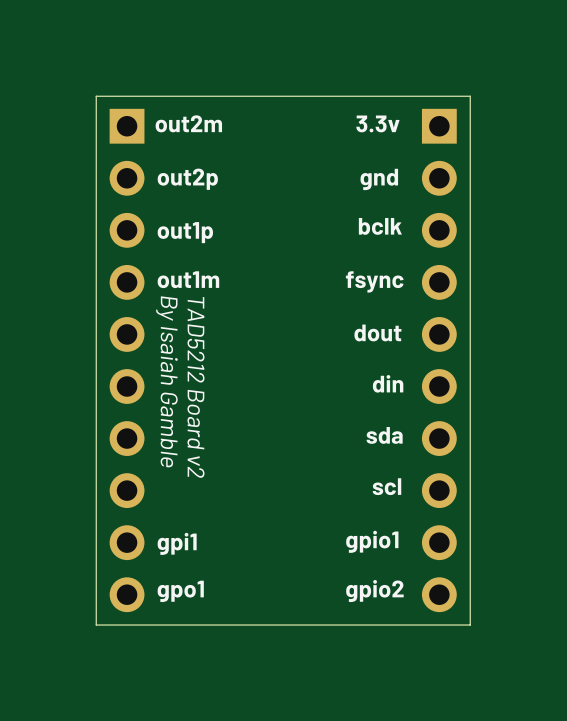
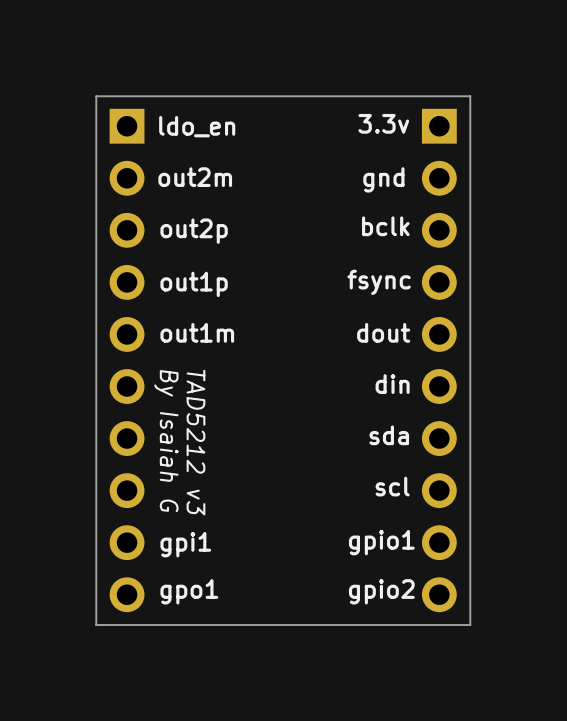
text: out2m (188, 123) -> ldo_en (197, 126)
text: out2p (187, 179) -> out2m (195, 177)
text: none -> out2p (194, 231)
text position: out1p (185, 232) -> out1p (194, 284)
text position: out1m (188, 279) -> out1m (197, 332)
text: By Isaiah Gamble (166, 381) -> By Isaiah G (166, 441)
text: TAD5212 Board v2 (195, 387) -> TAD5212 v3 (195, 442)

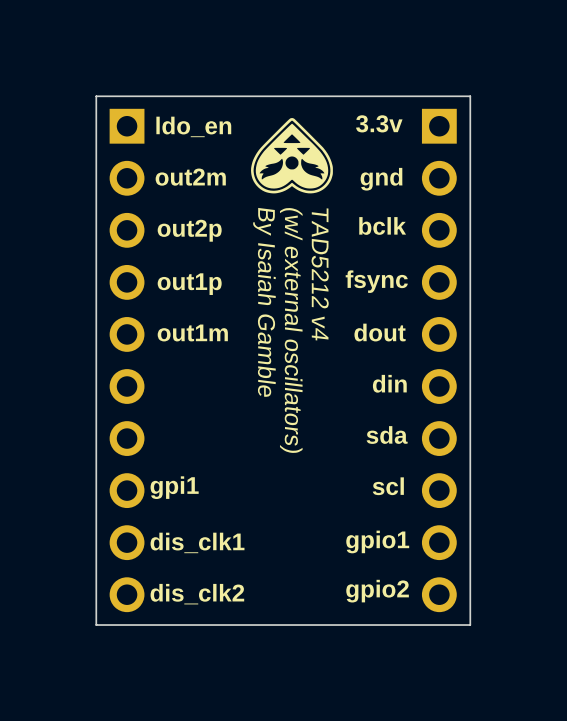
drawing: none -> [251, 118, 333, 194]
text: none -> TAD5212 v4 (320, 274)
text: none -> By Isaiah Gamble (264, 302)
text: none -> (w/ external oscillators) (291, 330)
text: By Isaiah G (166, 441) -> none
text: TAD5212 v3 (195, 442) -> none
text: none -> dis_clk1 (197, 542)
text position: gpi1 (185, 544) -> gpi1 (174, 487)
text: gpo1 (189, 591) -> dis_clk2 (197, 594)

